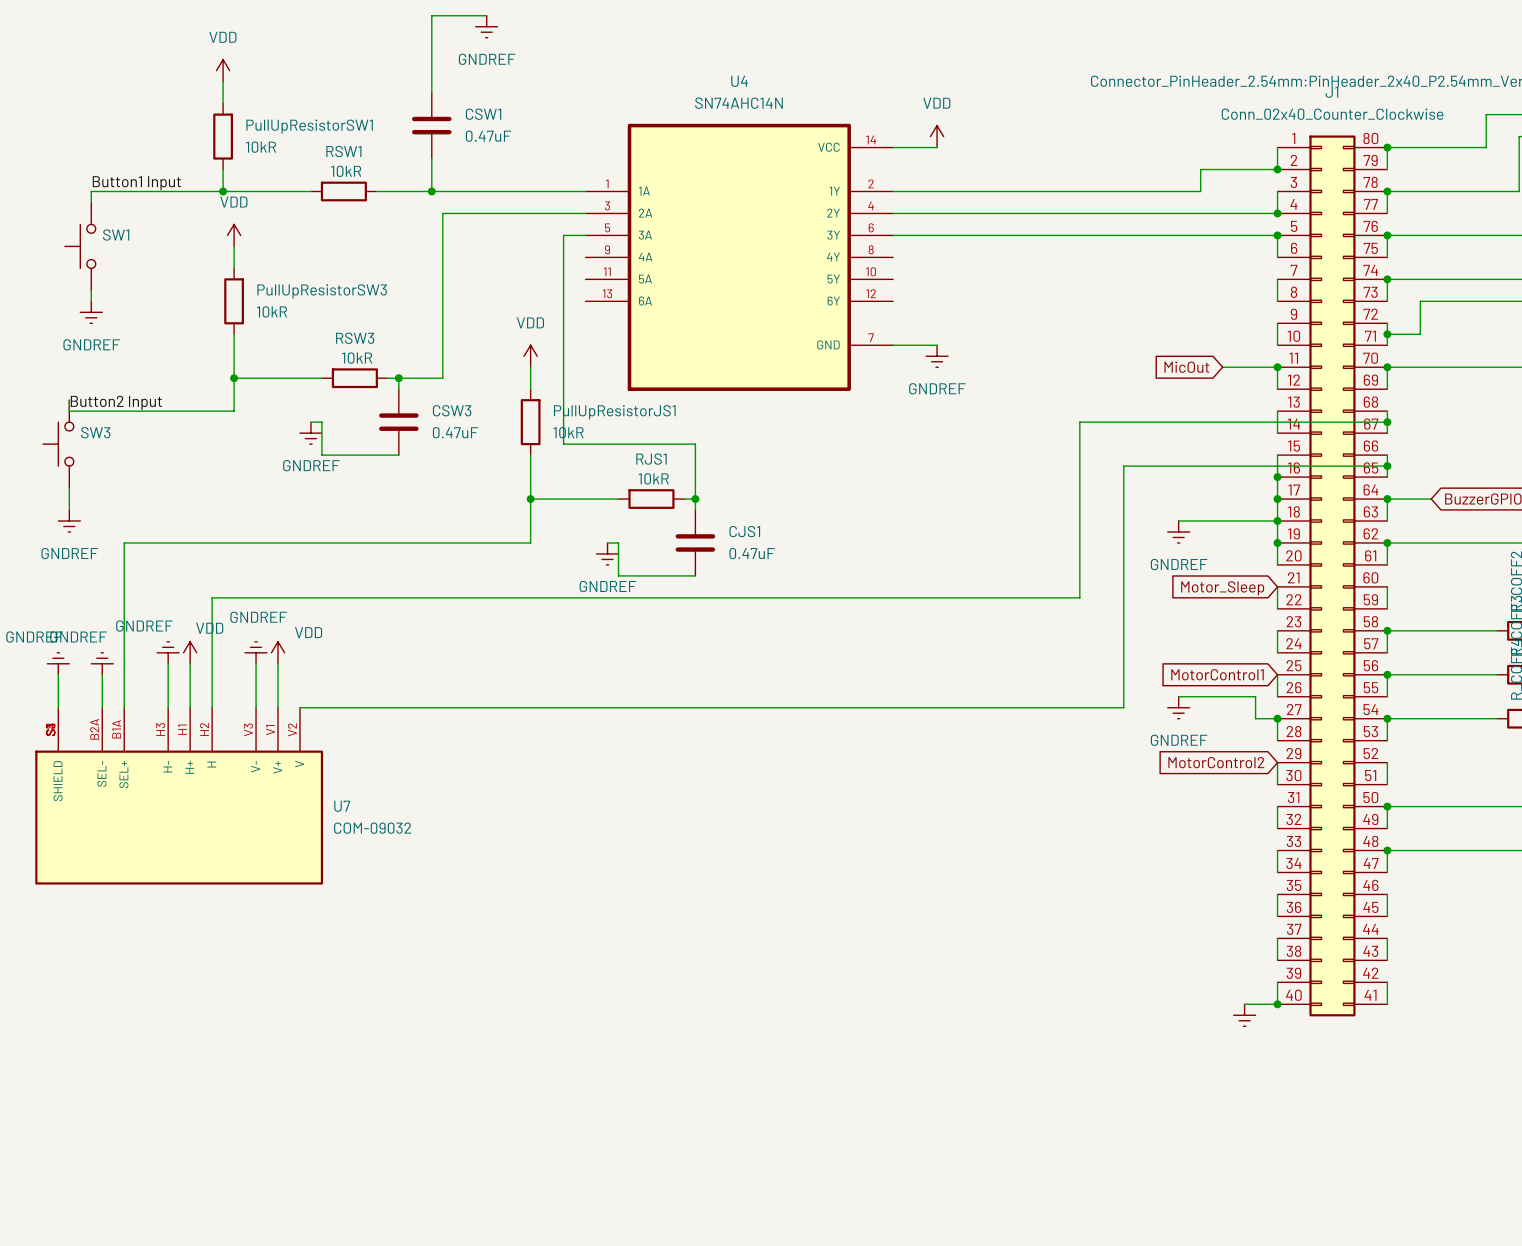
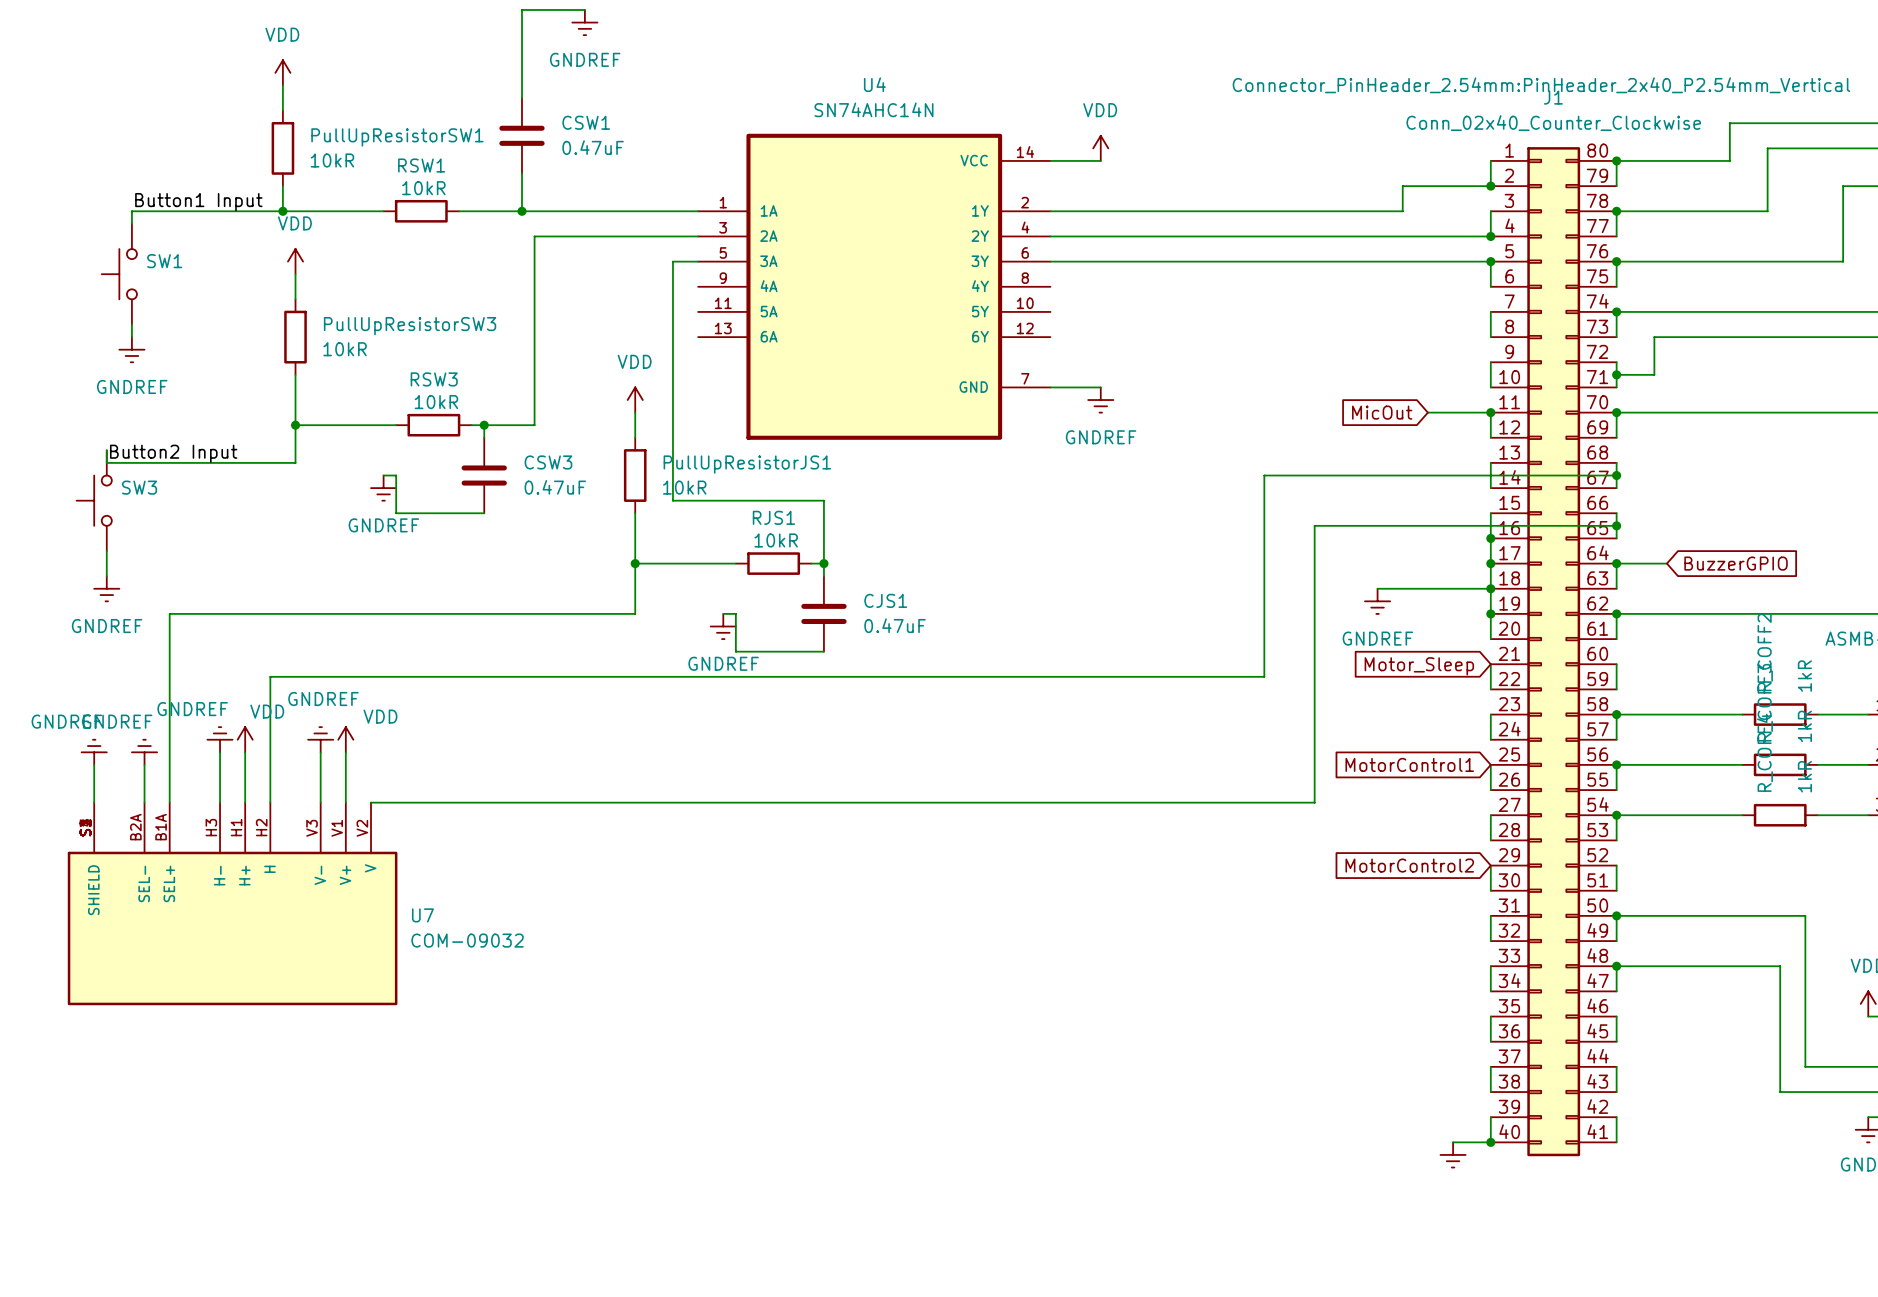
wire: (1178, 696) (1255, 696) (1255, 718) (1277, 718) -> none
power symbol: GNDREF (1178, 707) -> none
junction: (1277, 718) -> none

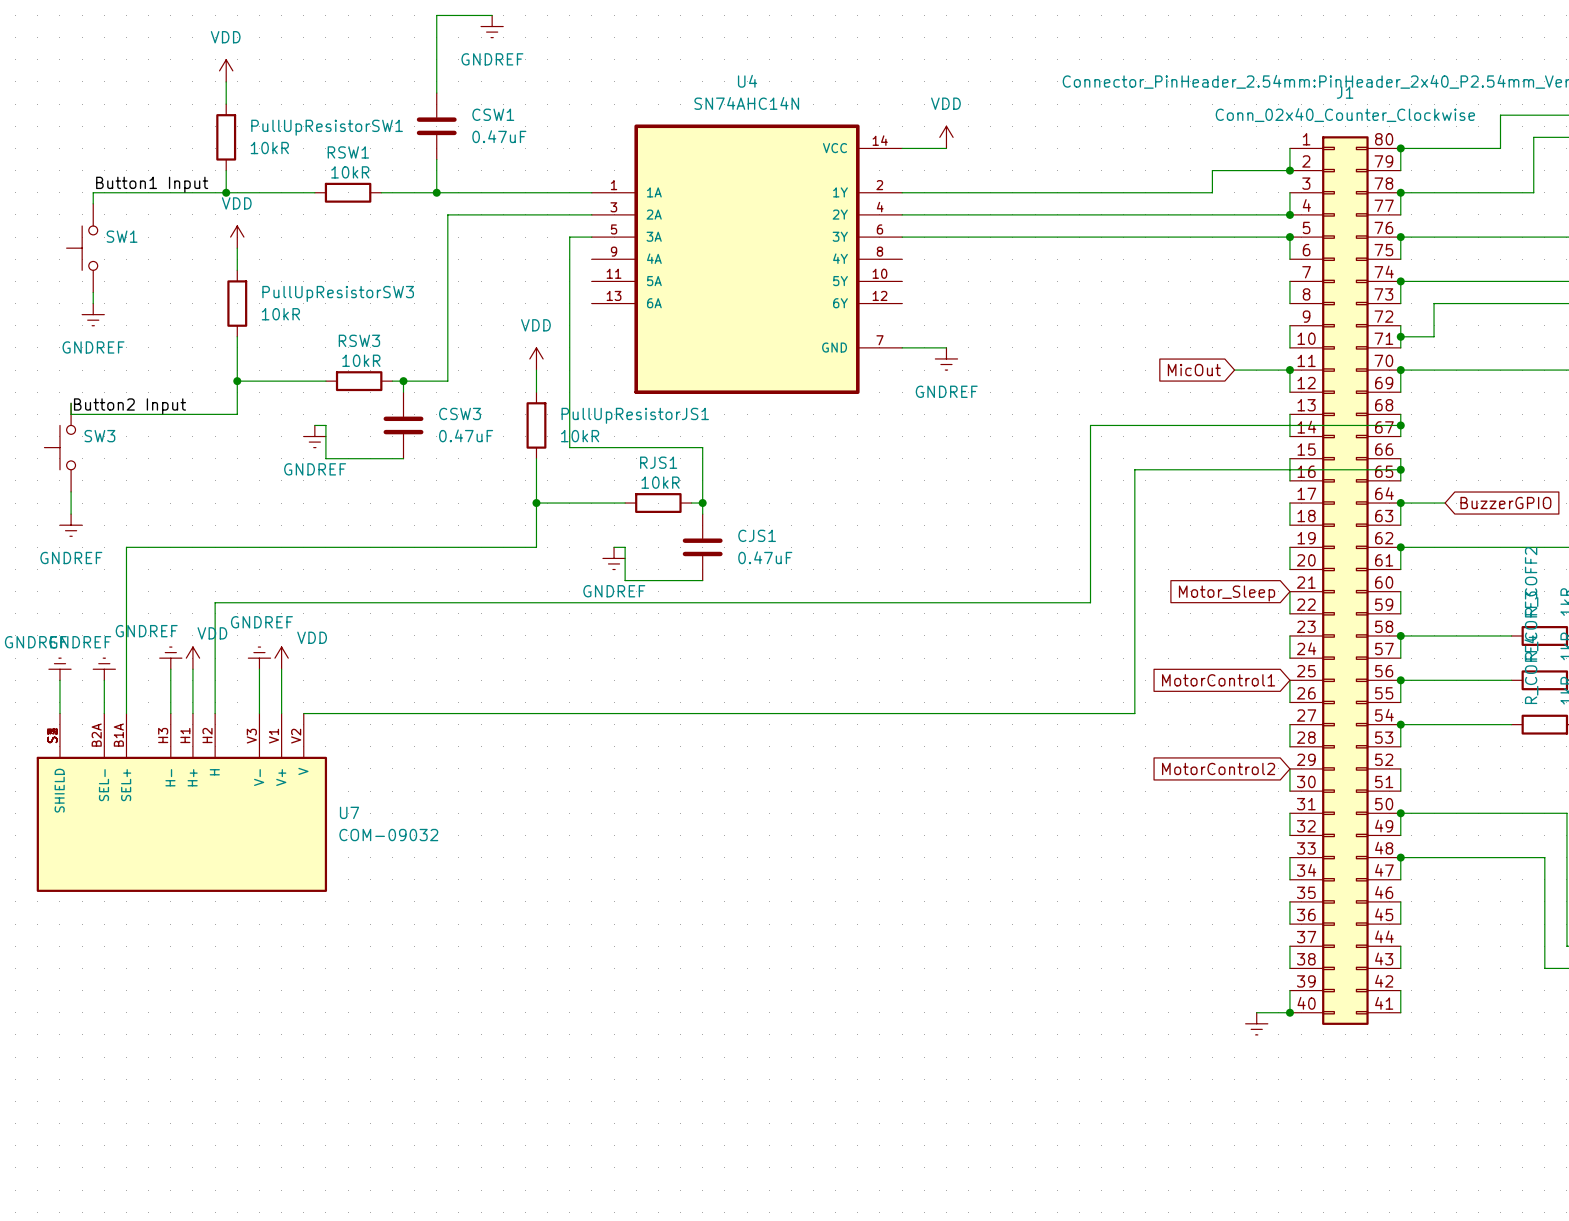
wire: (1490, 538) (1490, 563) -> none
junction: (1490, 538) -> none
junction: (1490, 563) -> none
wire: (1377, 588) (1490, 588) (1490, 613) -> none
junction: (1490, 588) -> none
power symbol: GNDREF (1377, 601) -> none
junction: (1490, 613) -> none

